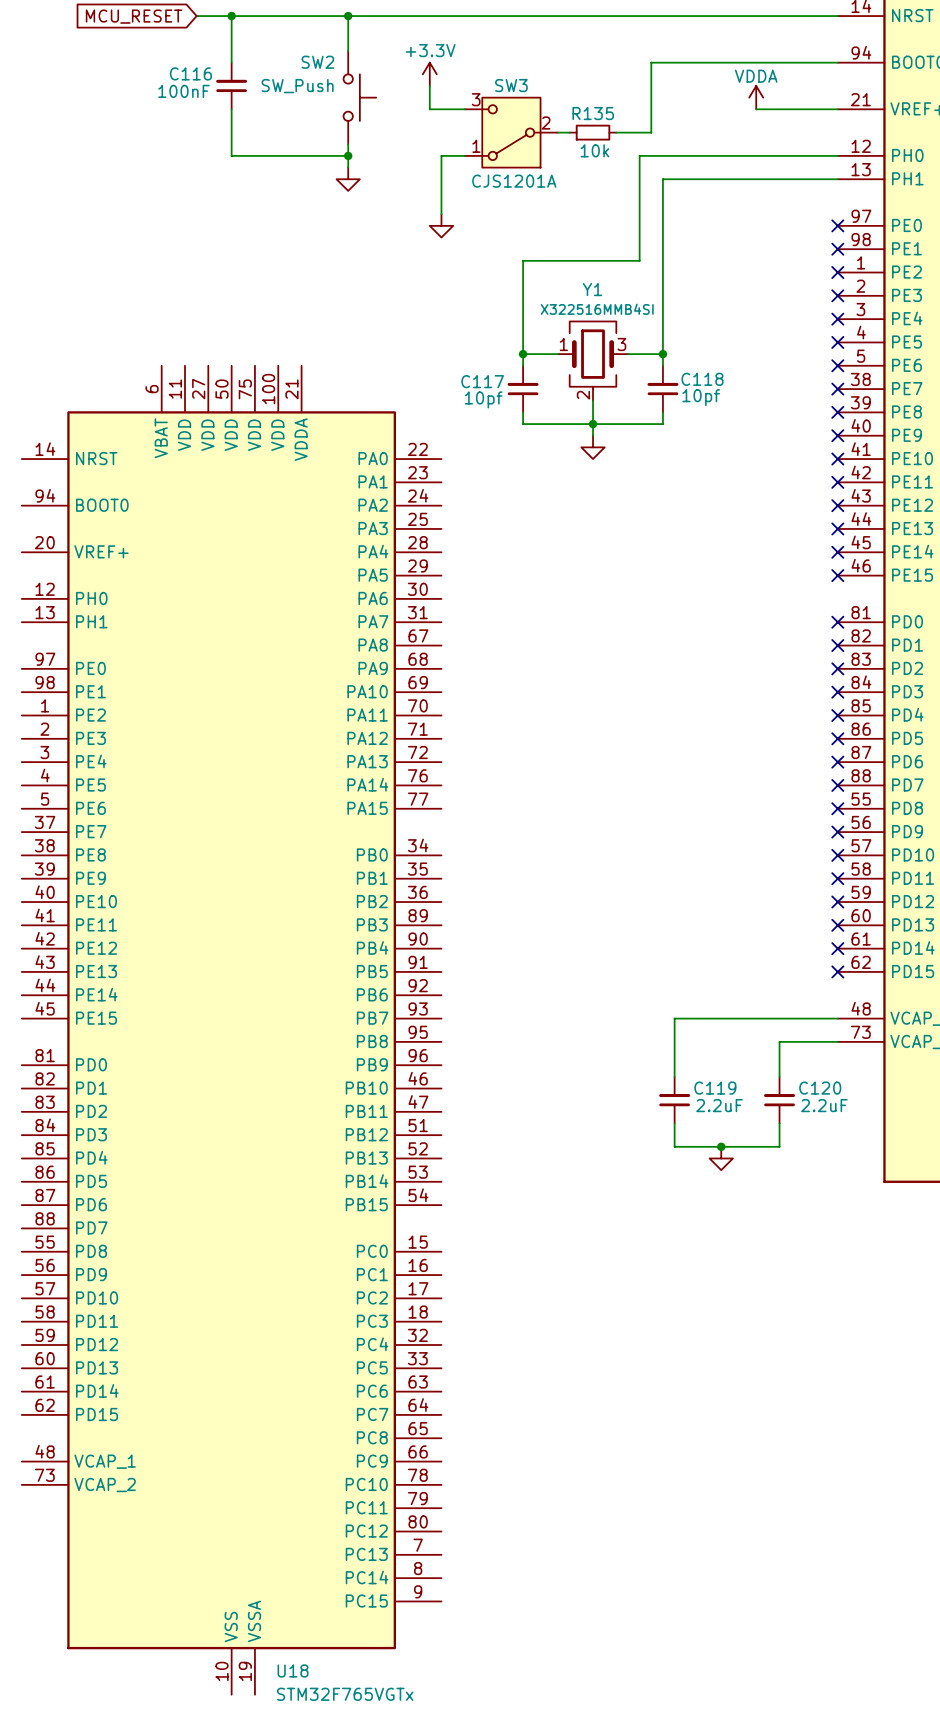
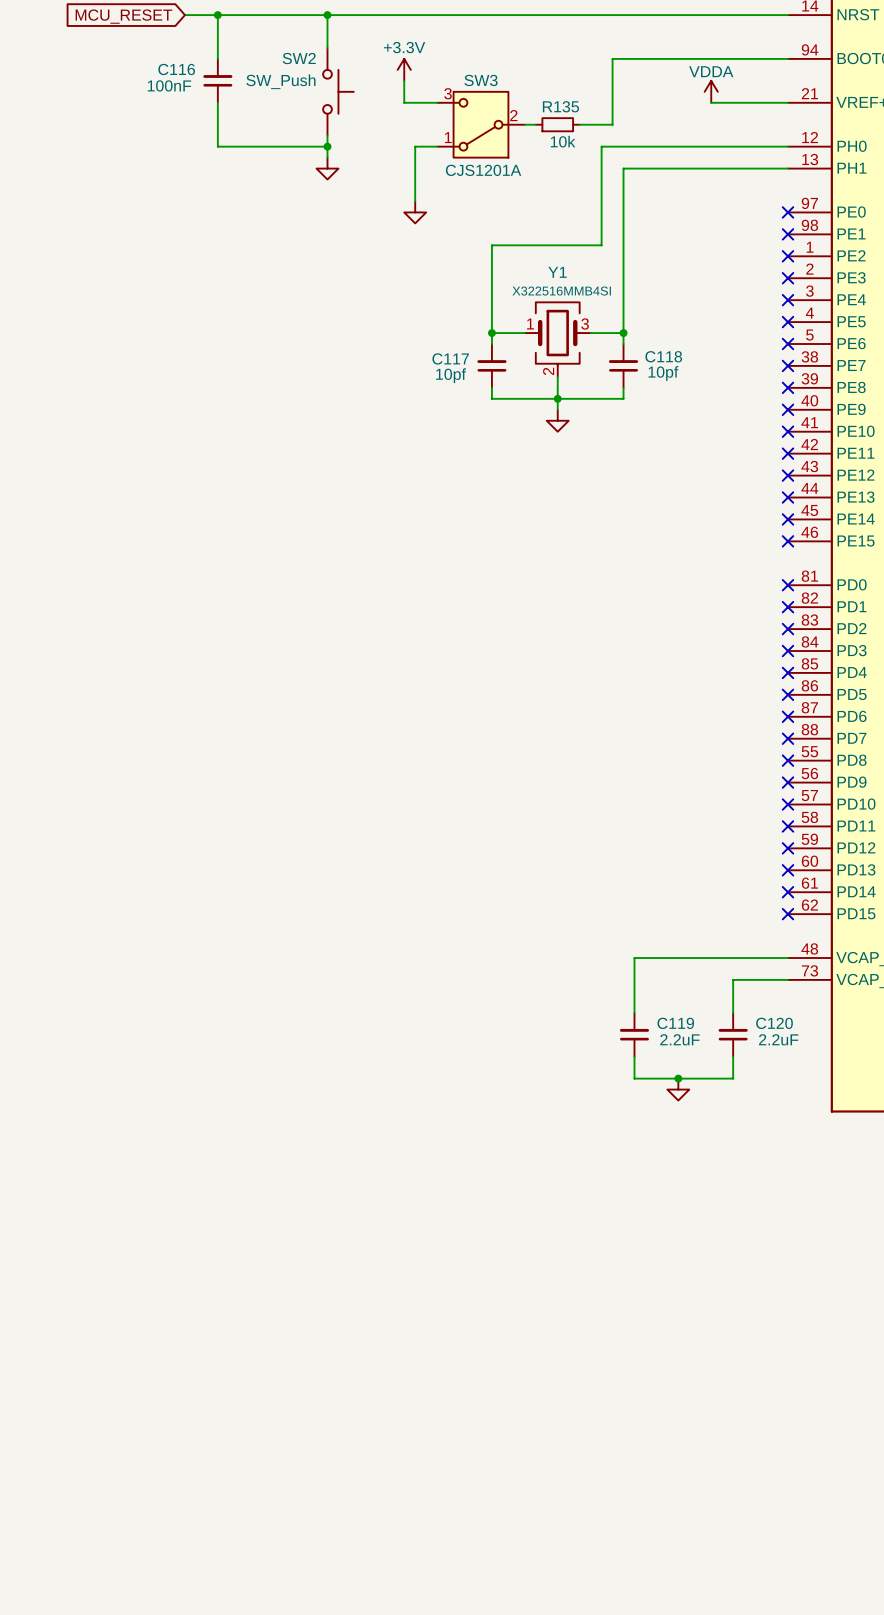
U18: STM32F765VGTx (231, 1030) -> none

